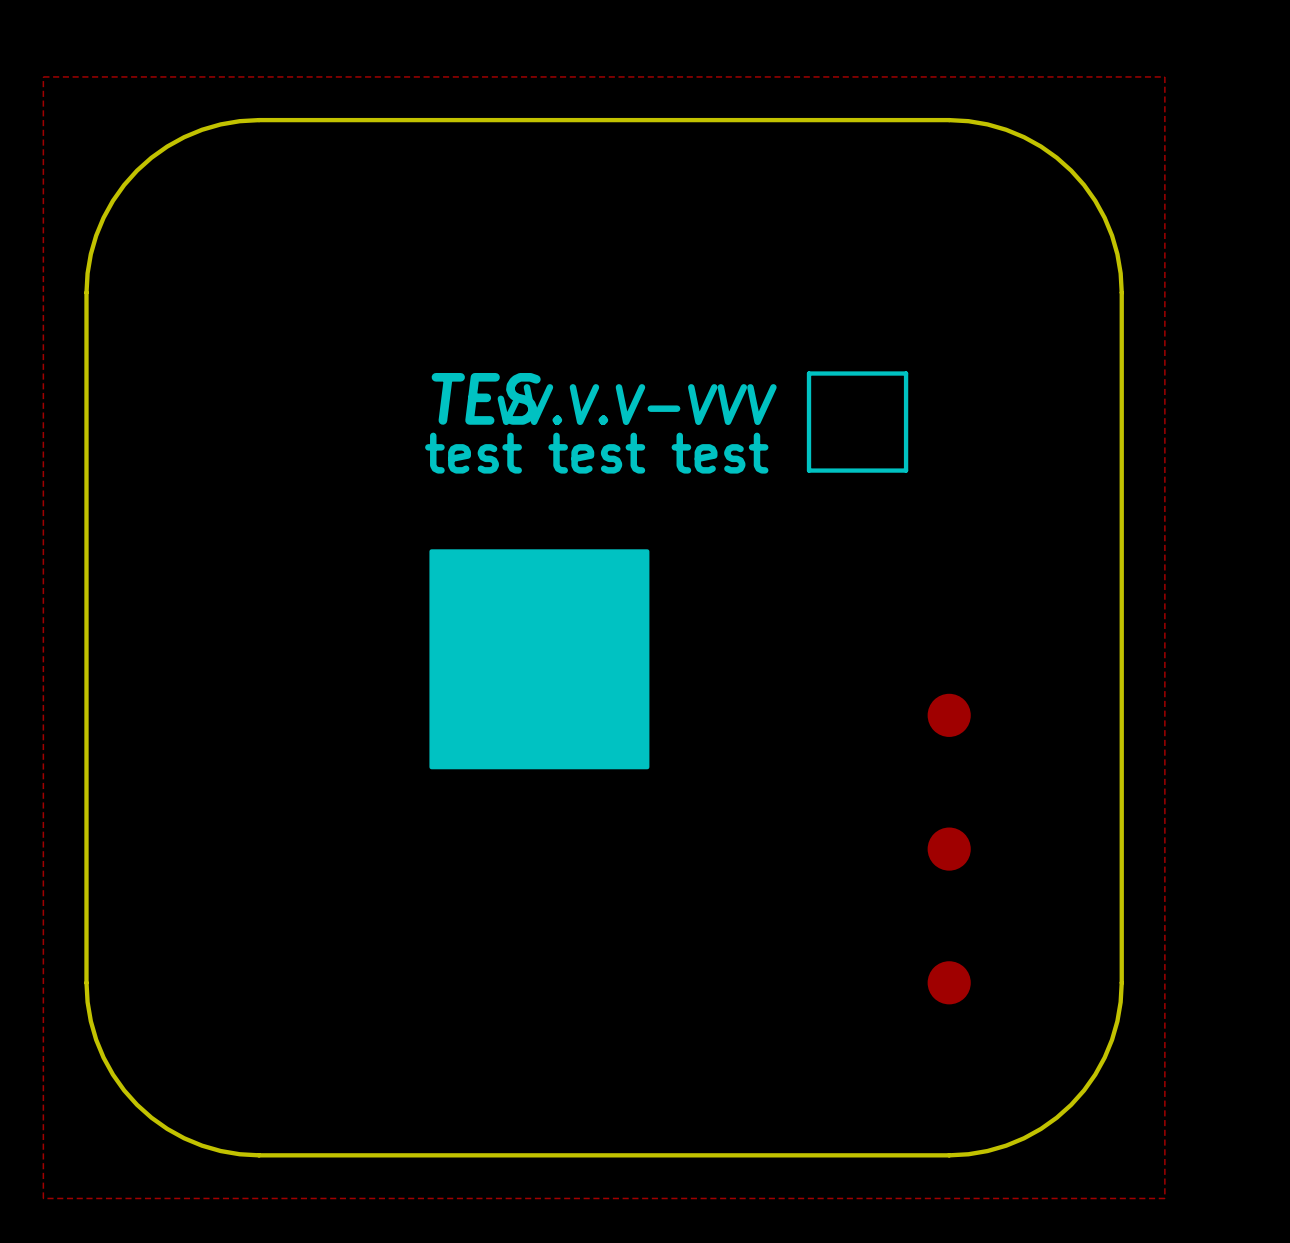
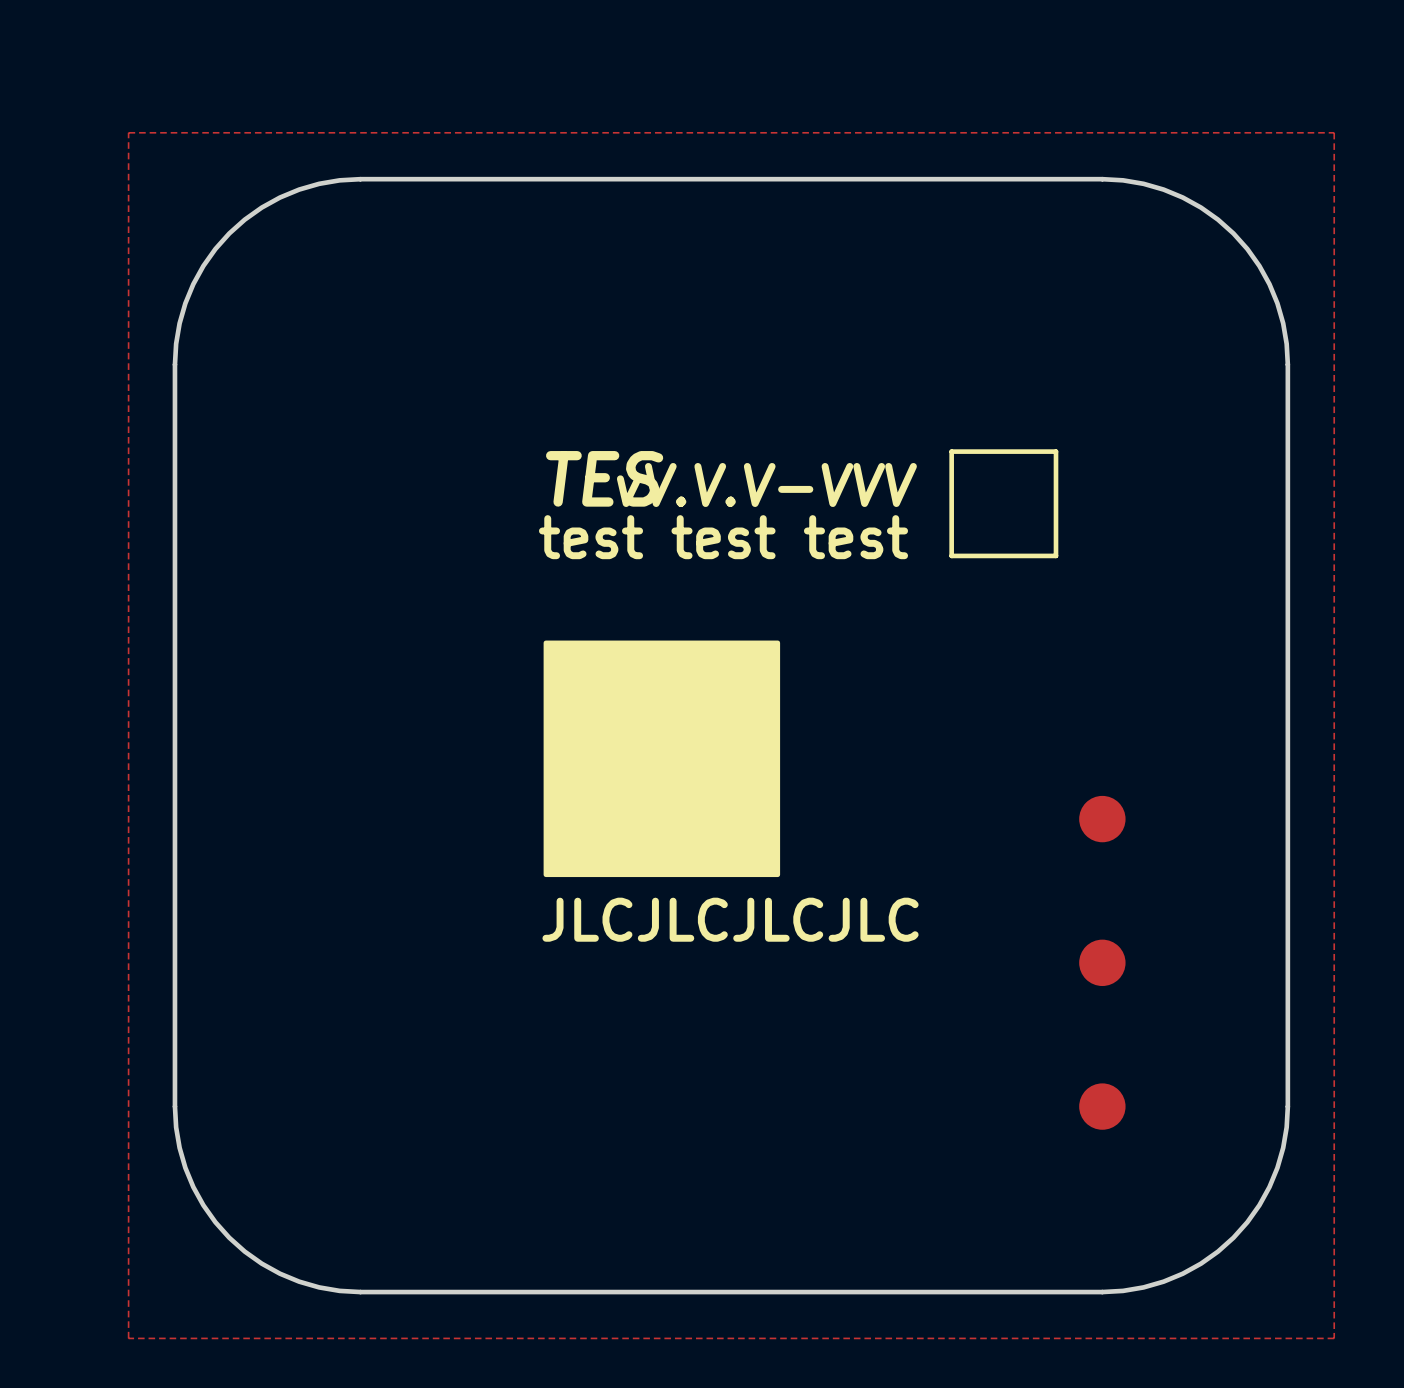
text: none -> JLCJLCJLCJLC (730, 919)

